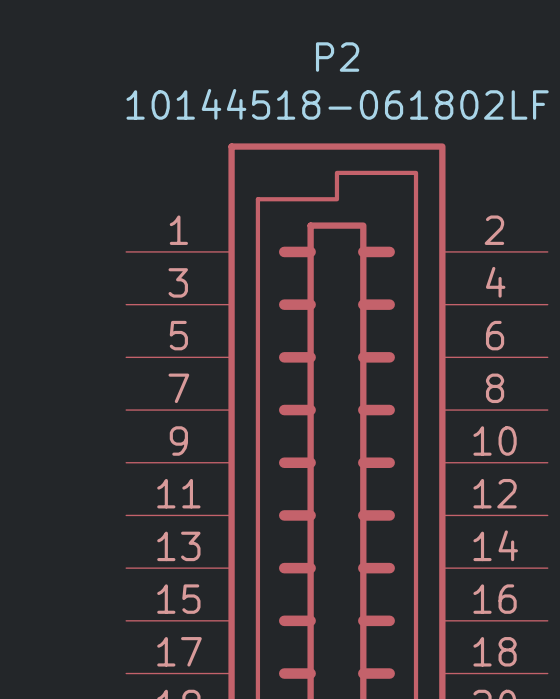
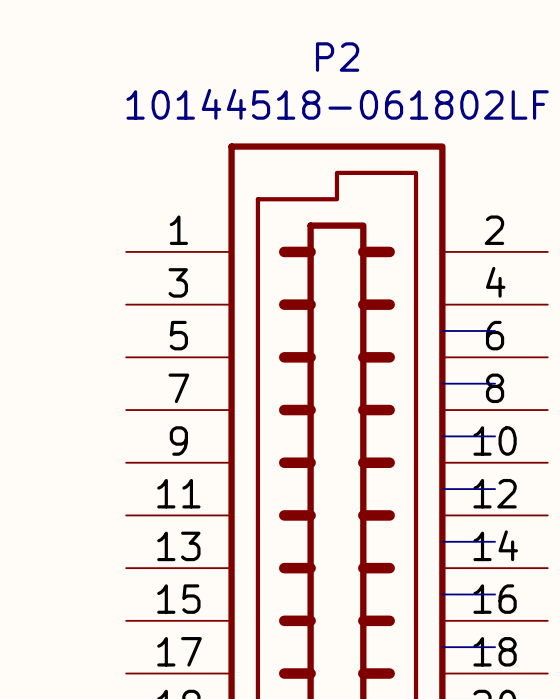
wire: none -> (442, 330) (495, 330)
wire: none -> (442, 383) (495, 383)
wire: none -> (442, 436) (495, 436)
wire: none -> (442, 489) (495, 489)
wire: none -> (442, 541) (495, 541)
wire: none -> (442, 594) (495, 594)
wire: none -> (442, 647) (495, 647)

